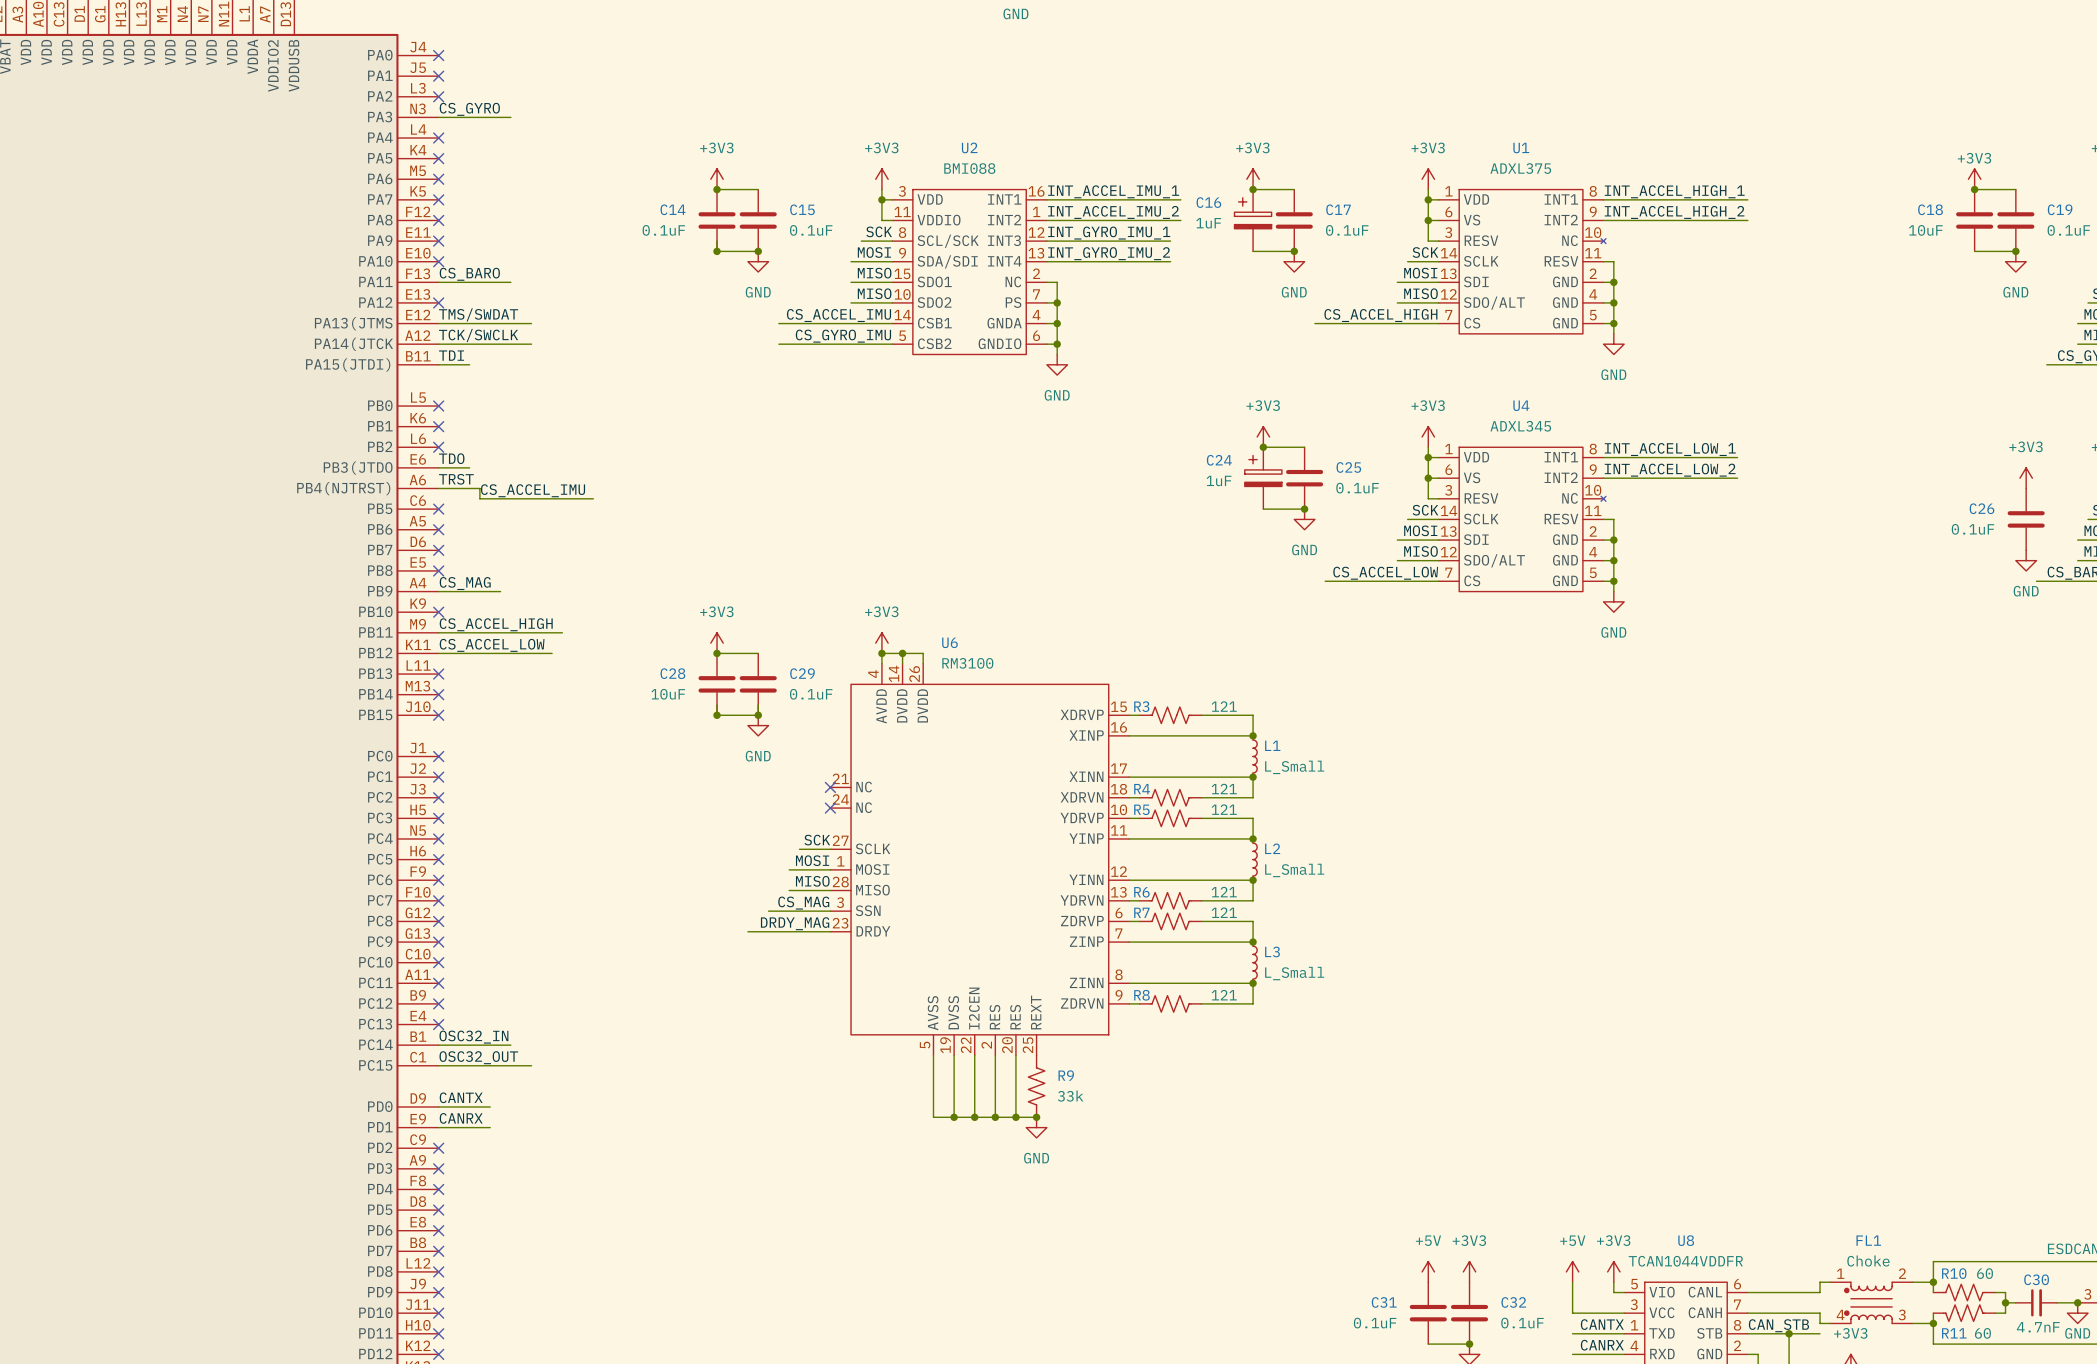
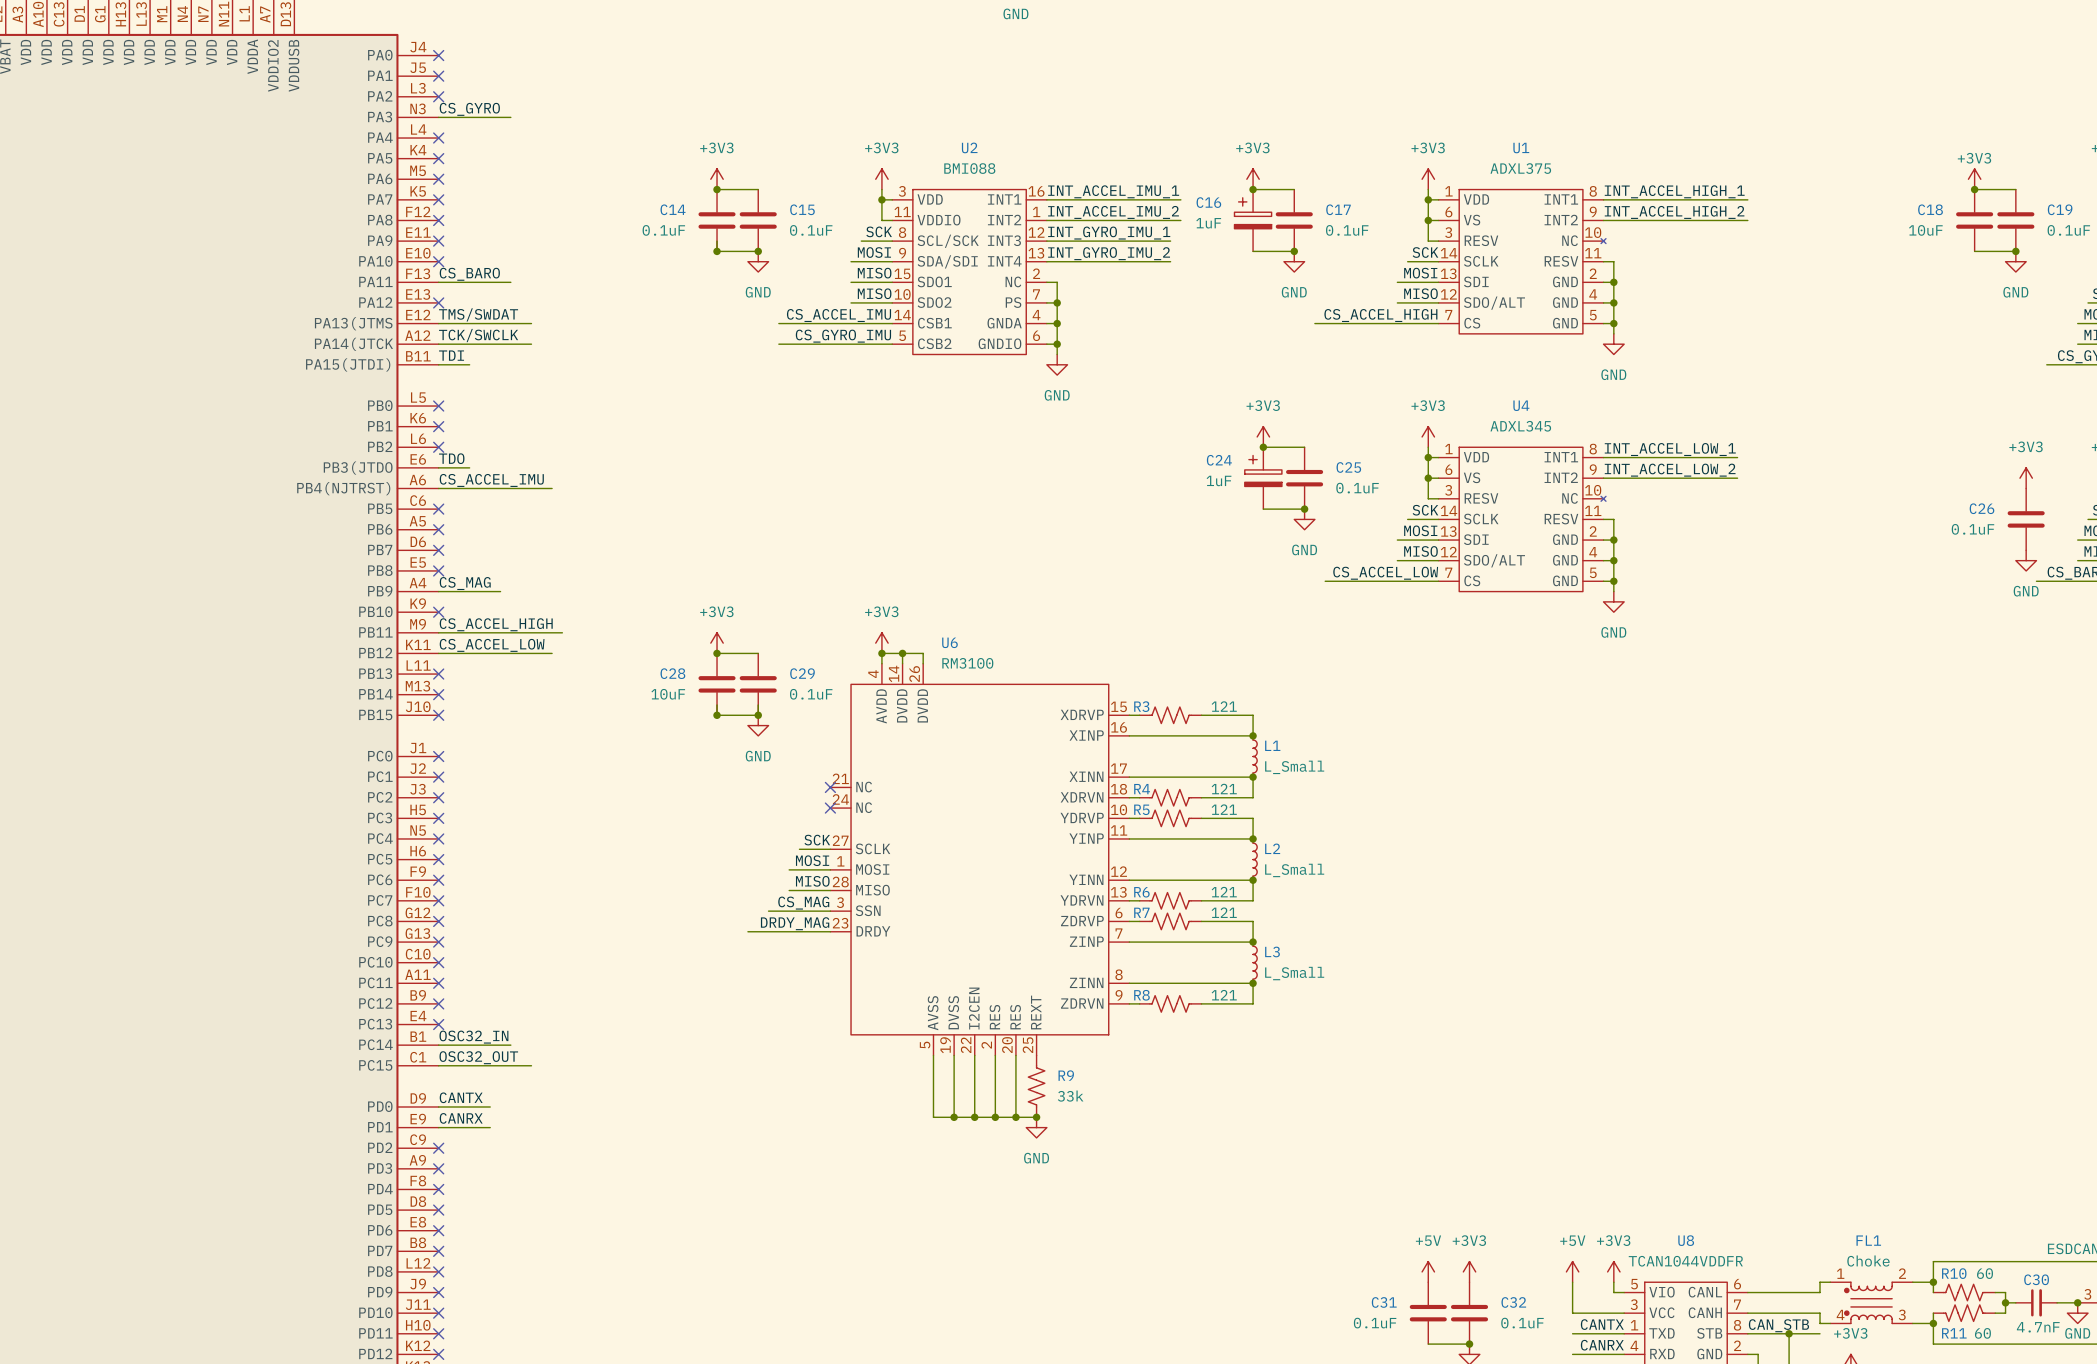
label: TRST (456, 479) -> CS_ACCEL_IMU (491, 480)
wire: (479, 488) (479, 498) (593, 498) -> (479, 488) (552, 488)
label: CS_ACCEL_IMU (533, 490) -> none

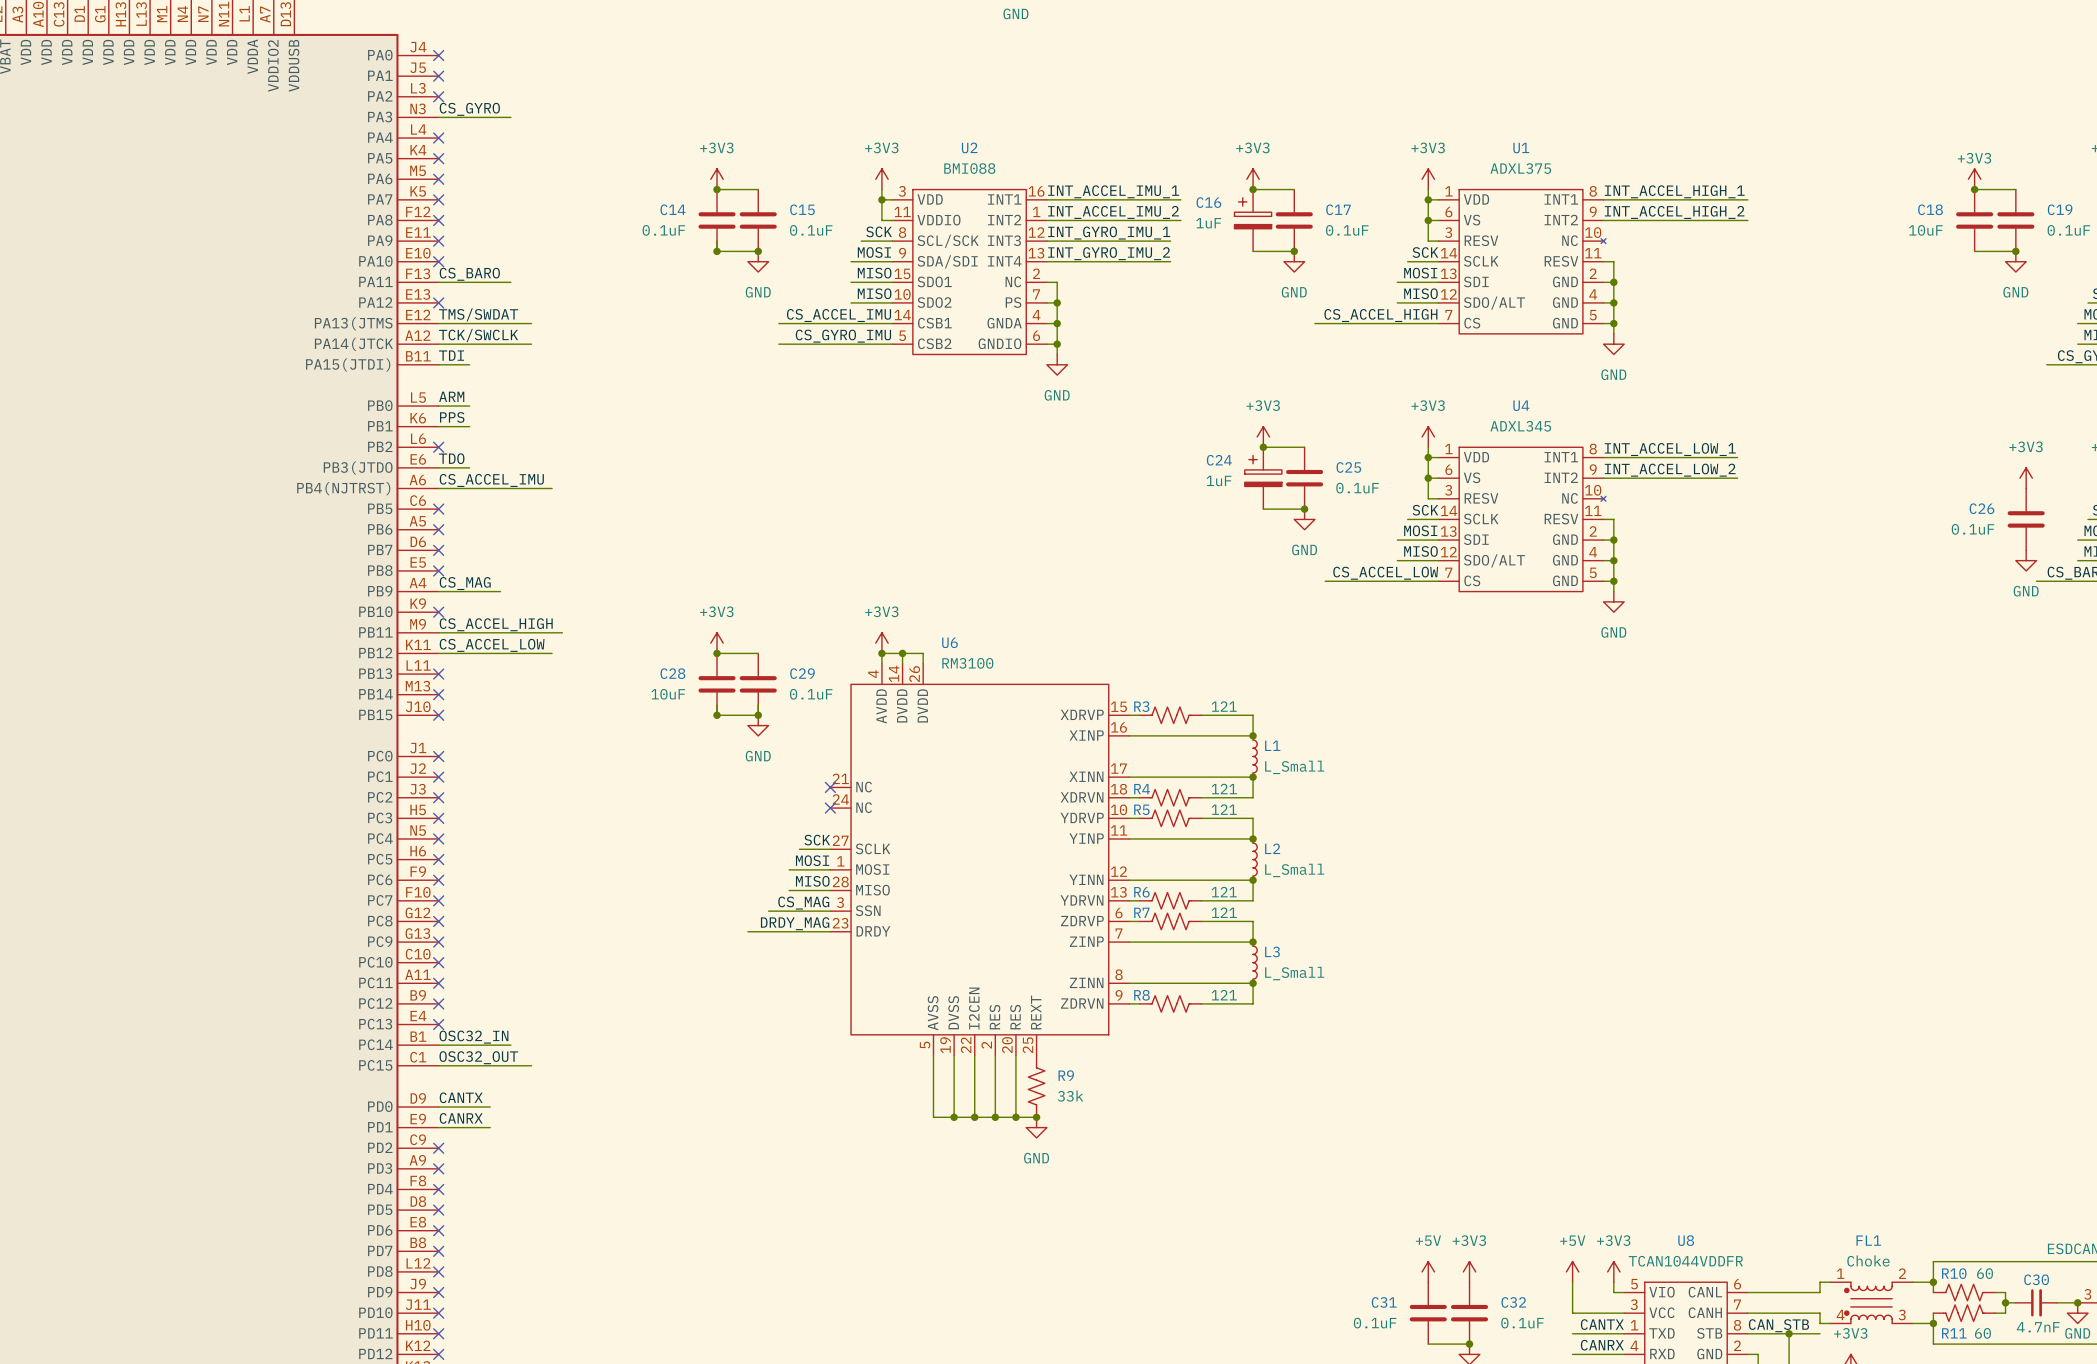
label: none -> ARM (451, 396)
wire: none -> (438, 406) (469, 406)
no-connect mark: (438, 406) -> none
label: none -> PPS (452, 417)
wire: none -> (438, 426) (469, 426)
no-connect mark: (438, 426) -> none

